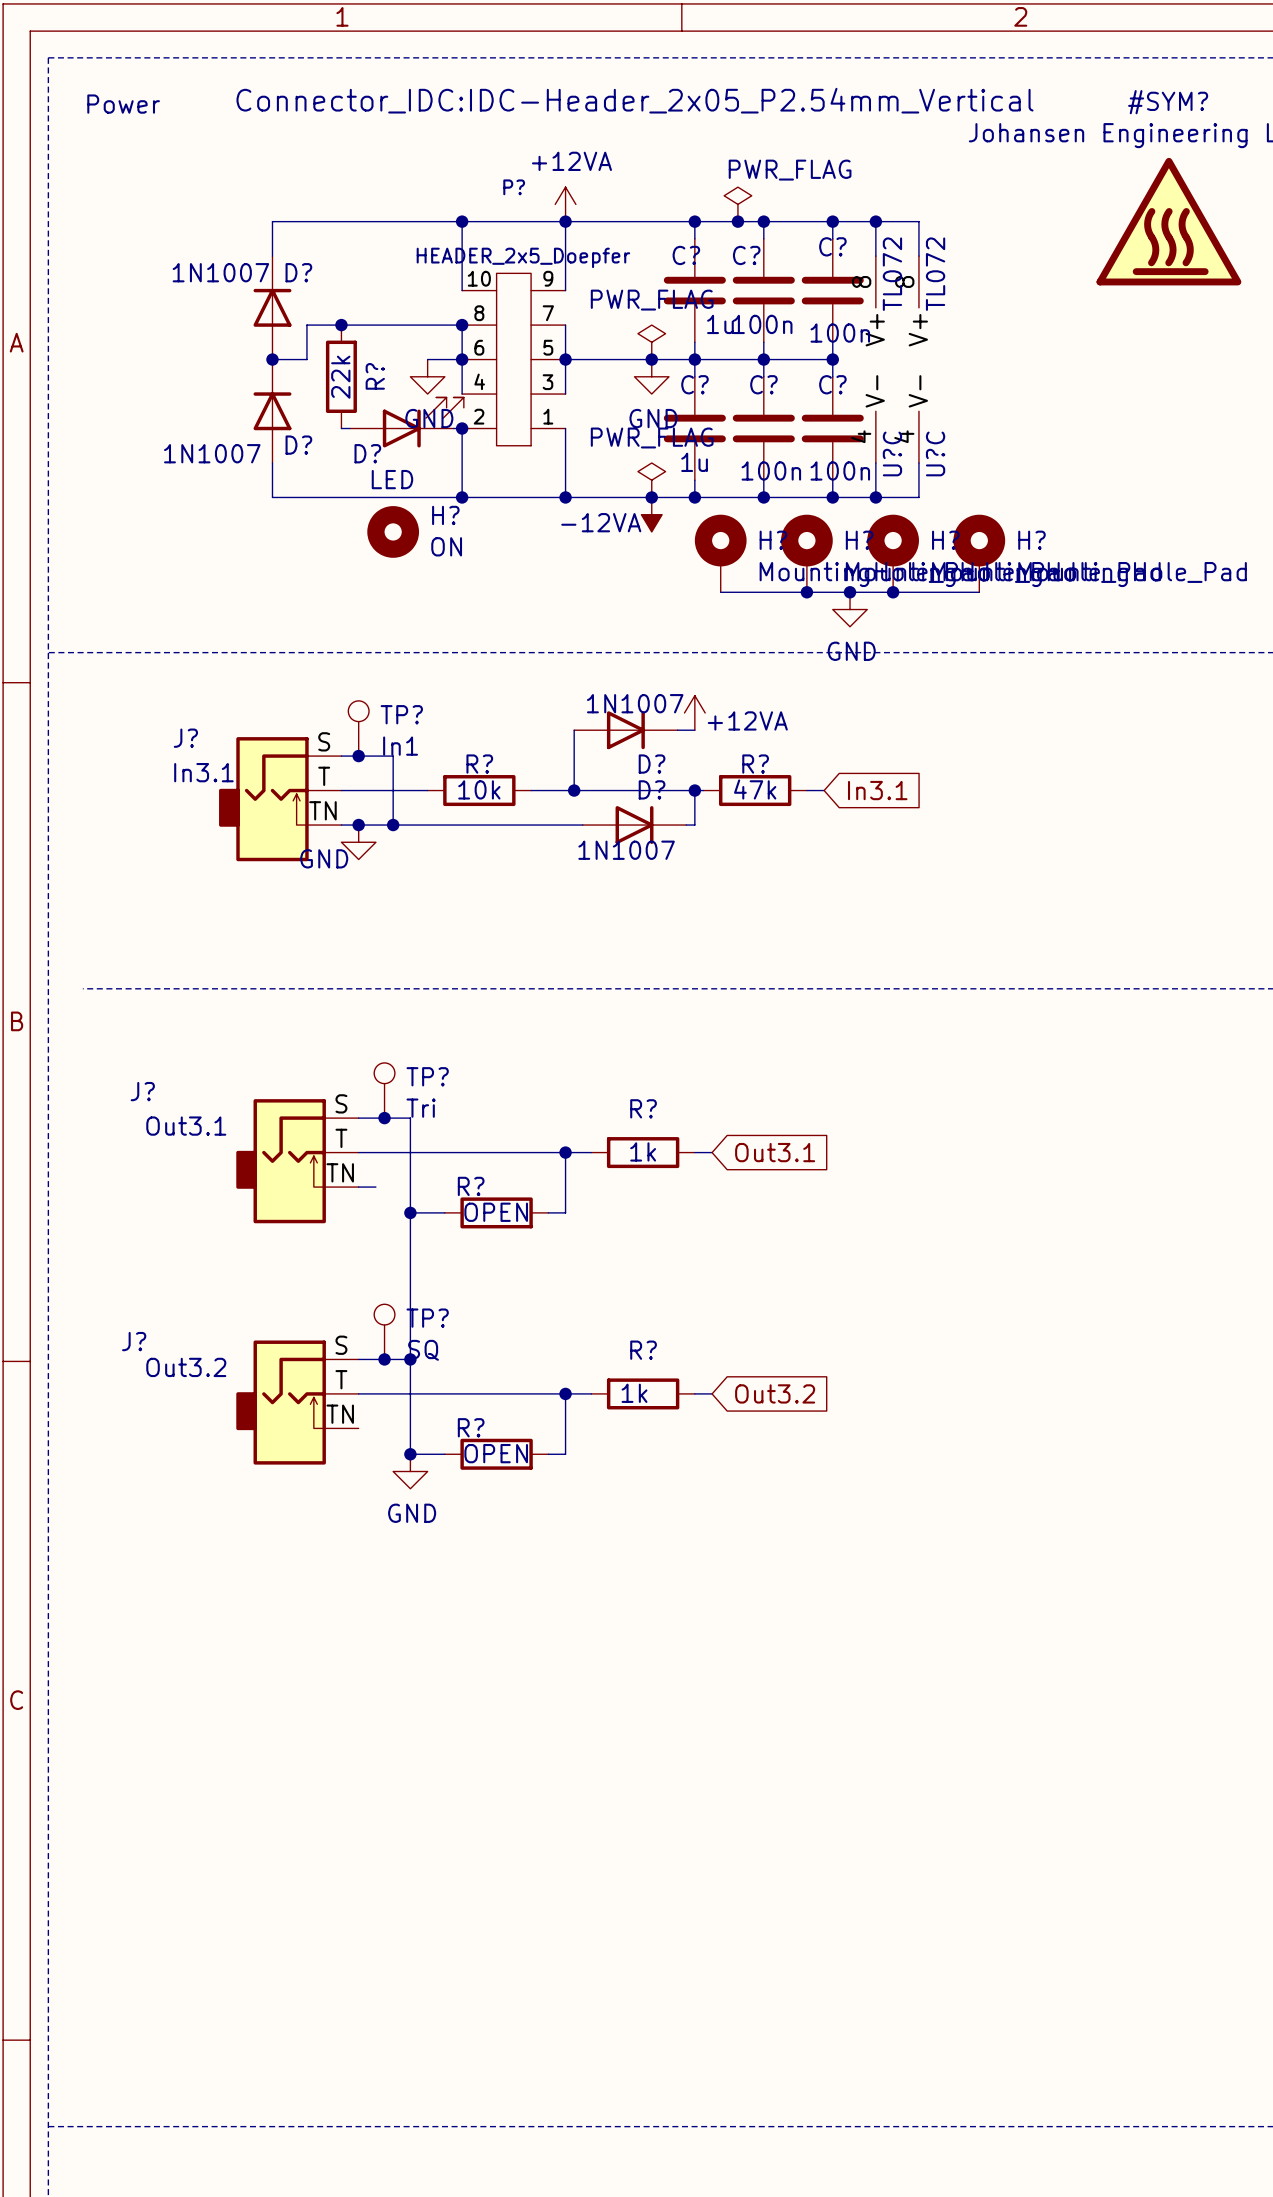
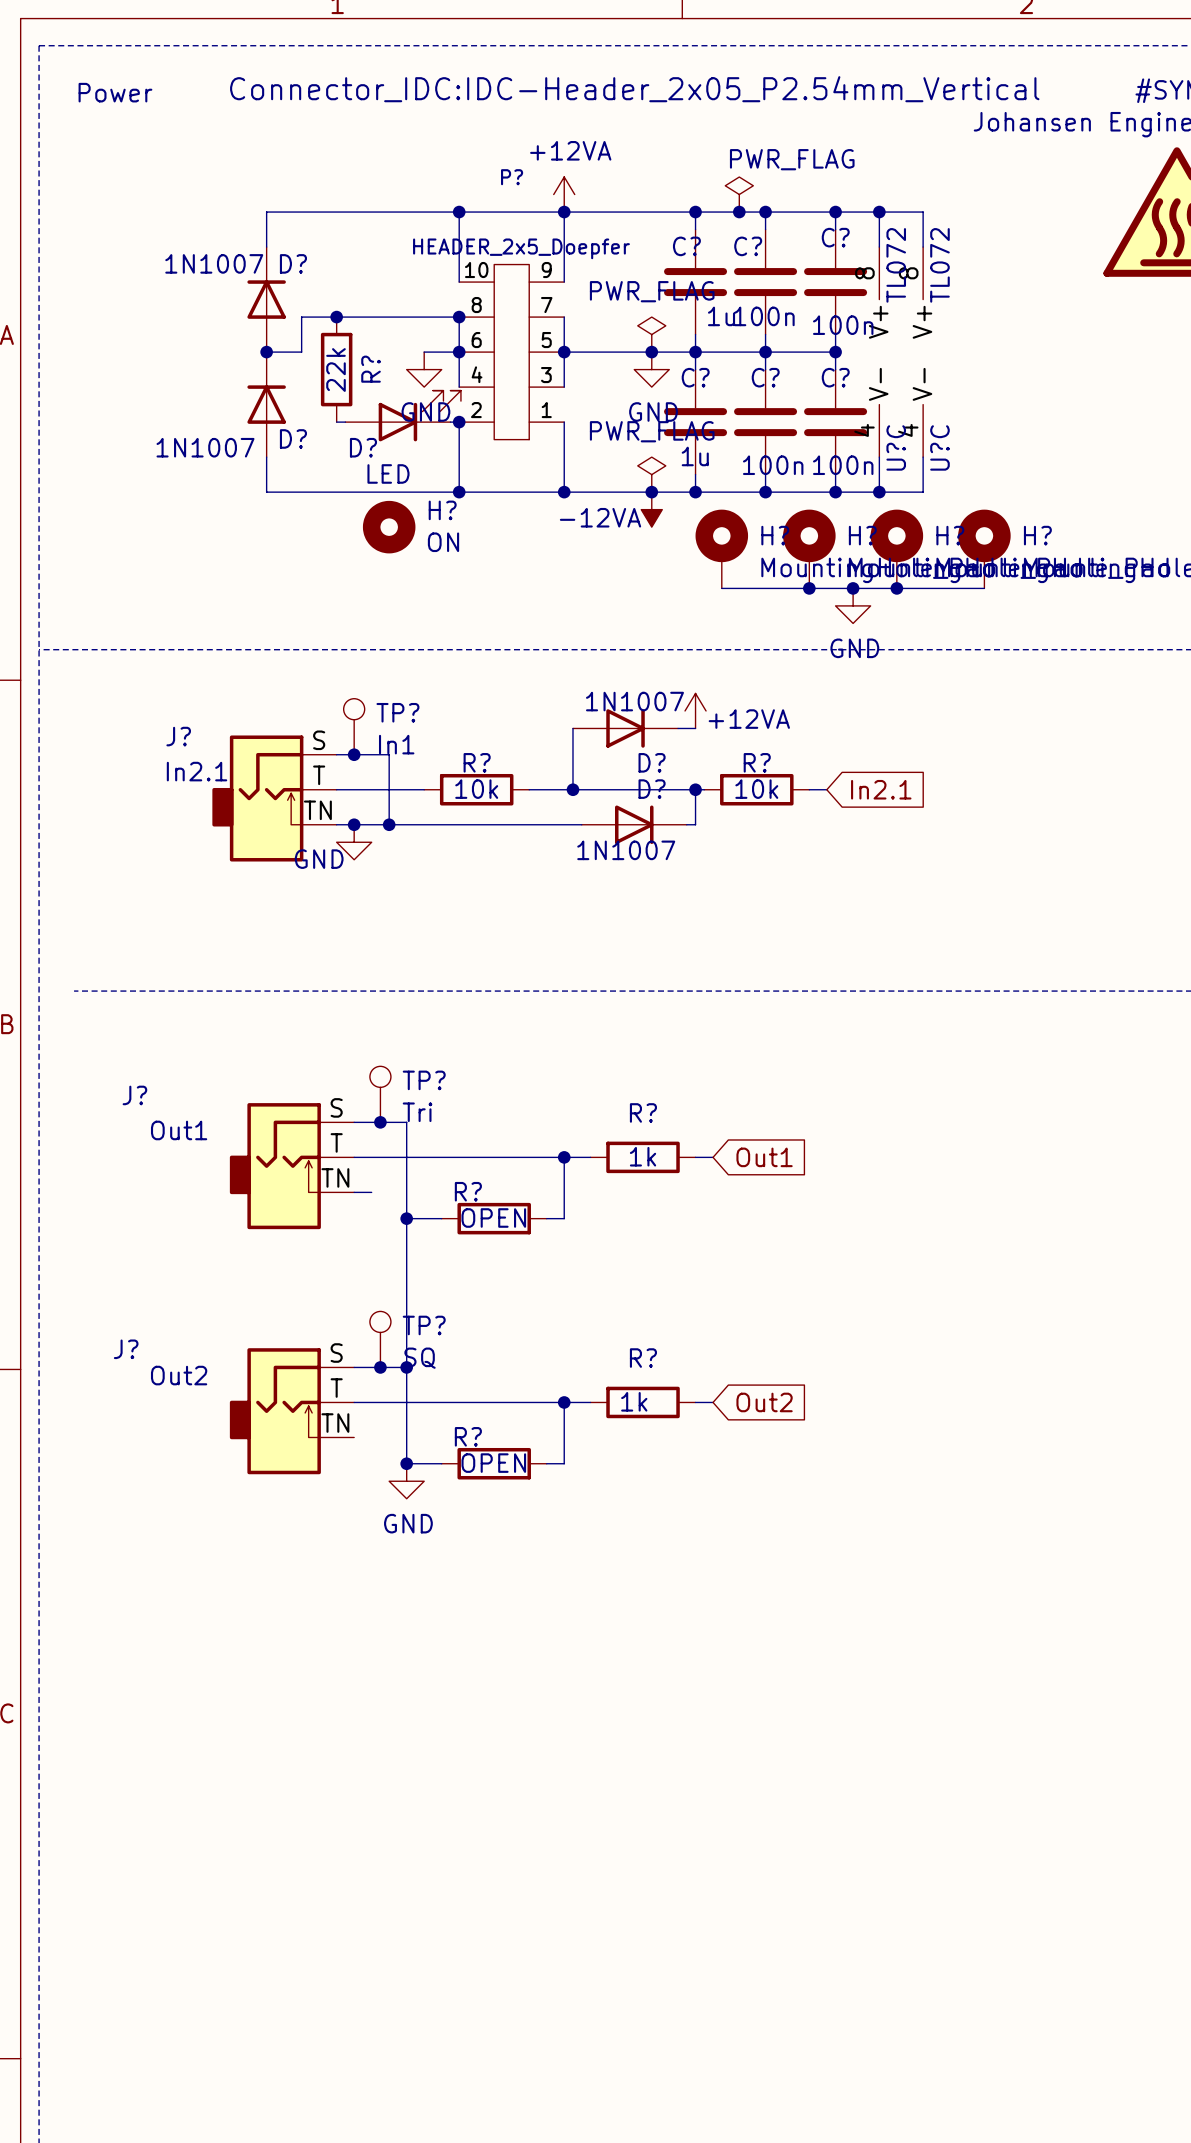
J? value: In3.1 (203, 772) -> In2.1 (197, 771)
R? value: 47k (755, 789) -> 10k (756, 789)
global label: In3.1 (877, 790) -> In2.1 (881, 789)
J? value: Out3.1 (186, 1126) -> Out1 (179, 1130)
global label: Out3.1 (775, 1152) -> Out1 (764, 1157)
J? value: Out3.2 (186, 1367) -> Out2 (179, 1375)
global label: Out3.2 (775, 1393) -> Out2 (764, 1402)

